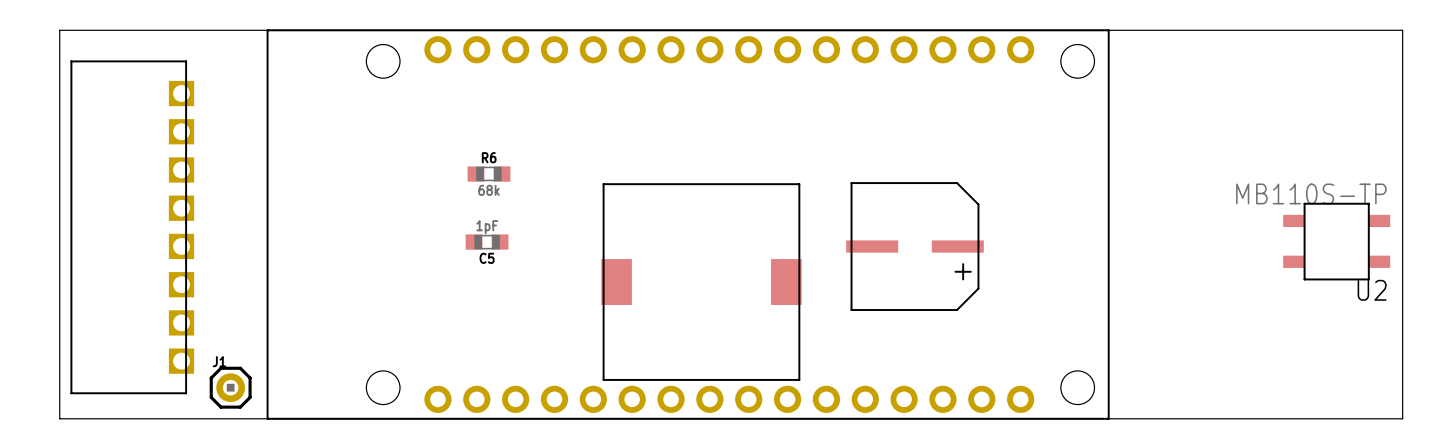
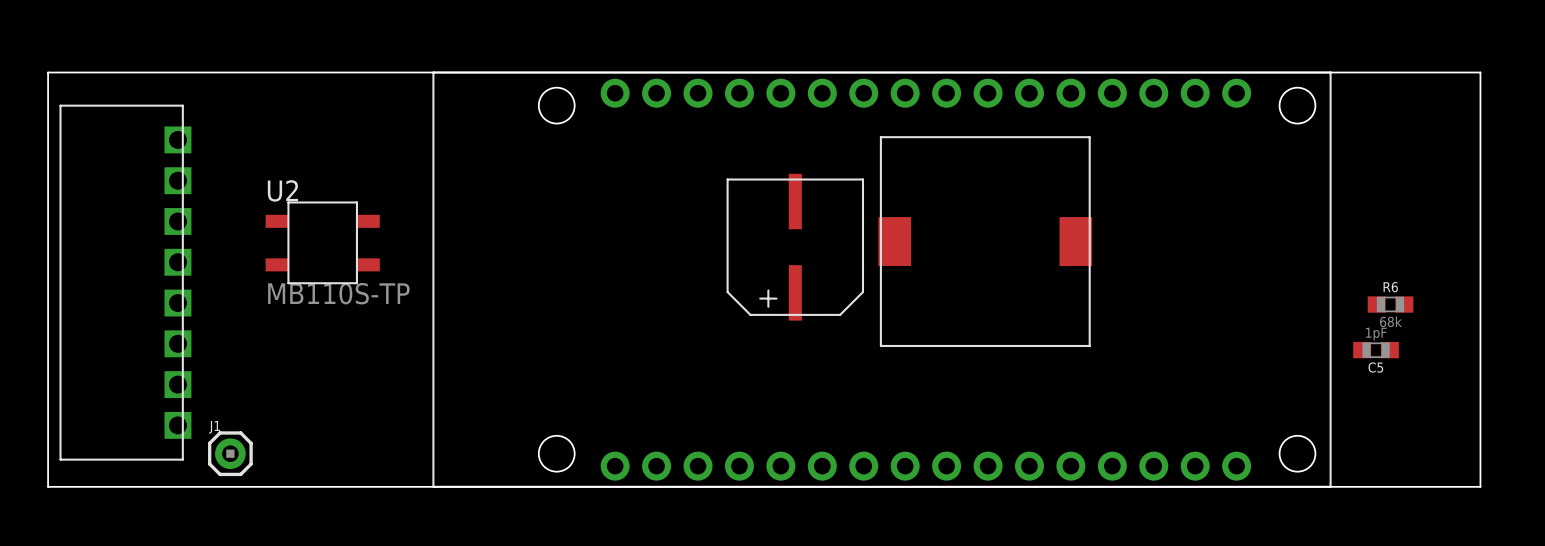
R6 position: (488, 174) -> (1390, 304)
part position: (688, 224) -> (882, 279)
U2 rotation: 0° (1336, 241) -> 180° (322, 242)
U2 position: (1336, 241) -> (322, 242)
C5 position: (487, 242) -> (1376, 350)
part rotation: 0° (914, 246) -> 90° clockwise (795, 247)
part position: (914, 246) -> (795, 247)
part position: (701, 282) -> (985, 241)

